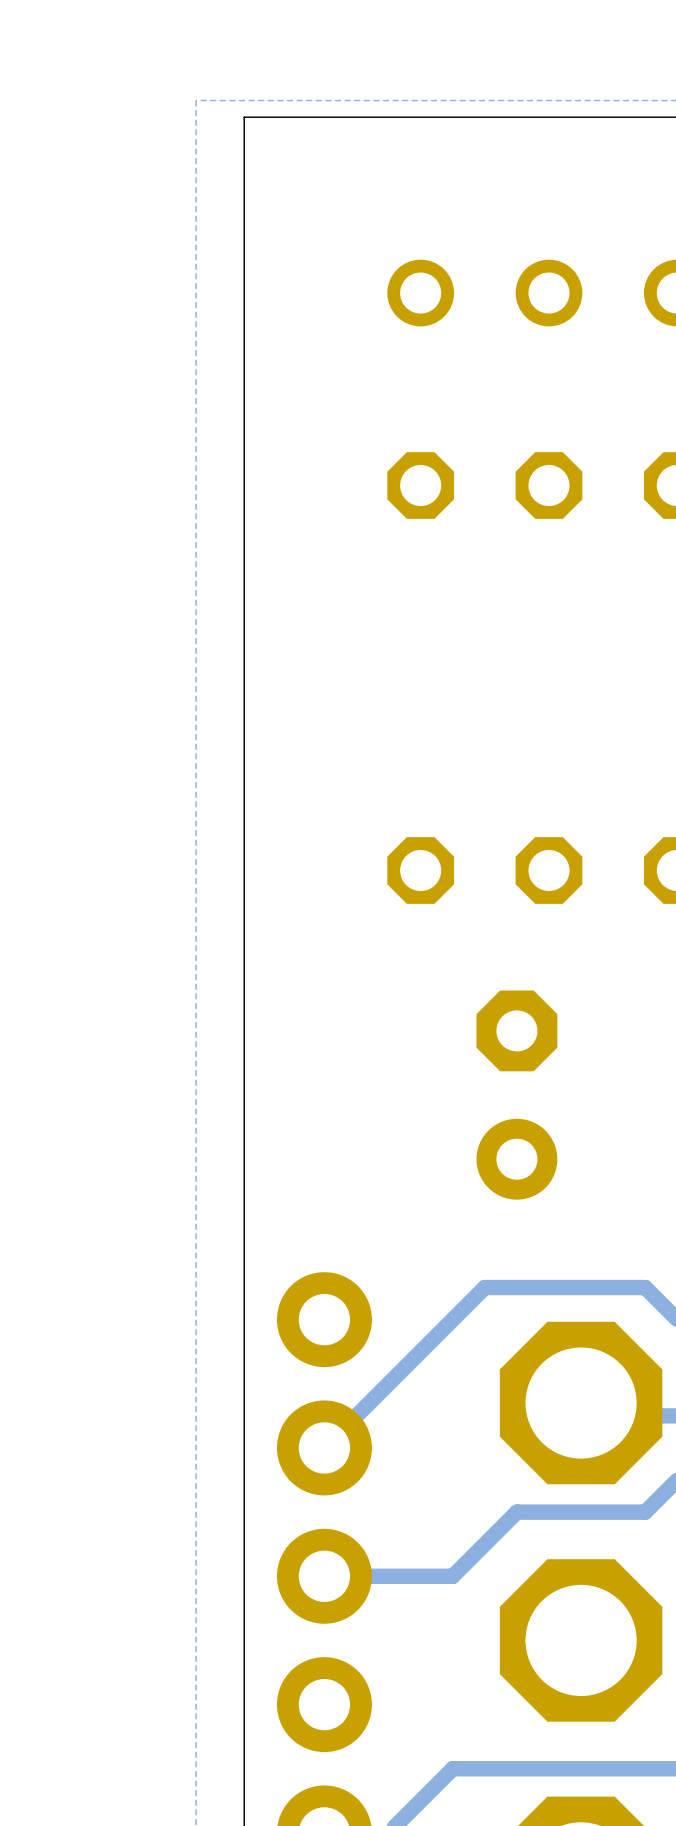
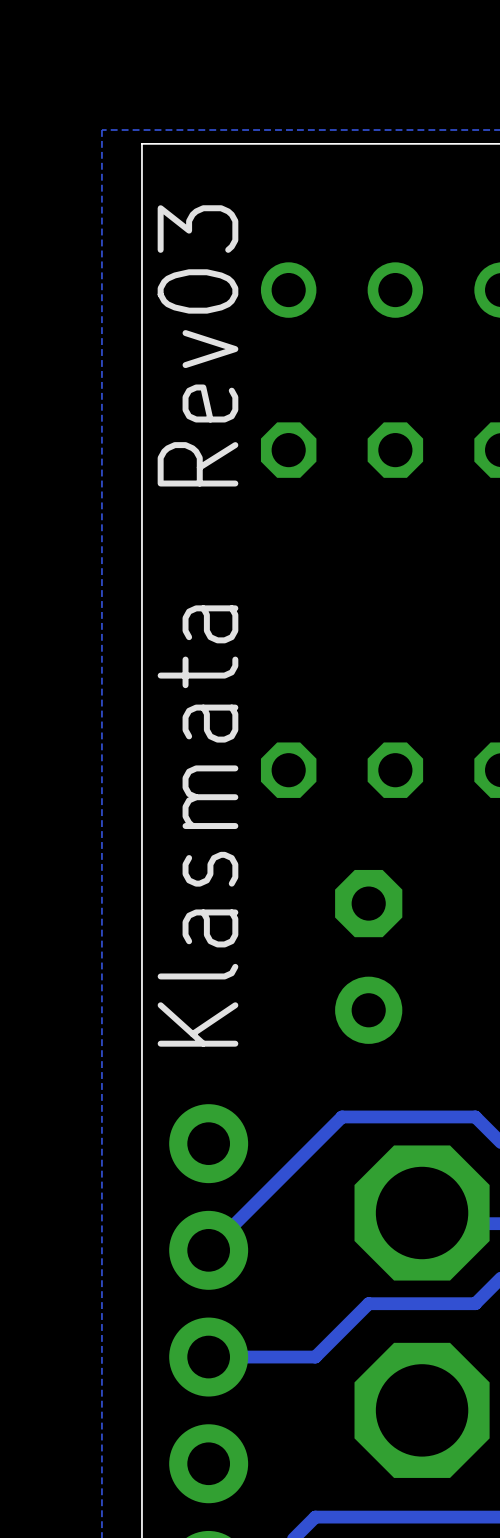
text: none -> Rev03 (197, 345)
text: none -> Klasmata (197, 826)

